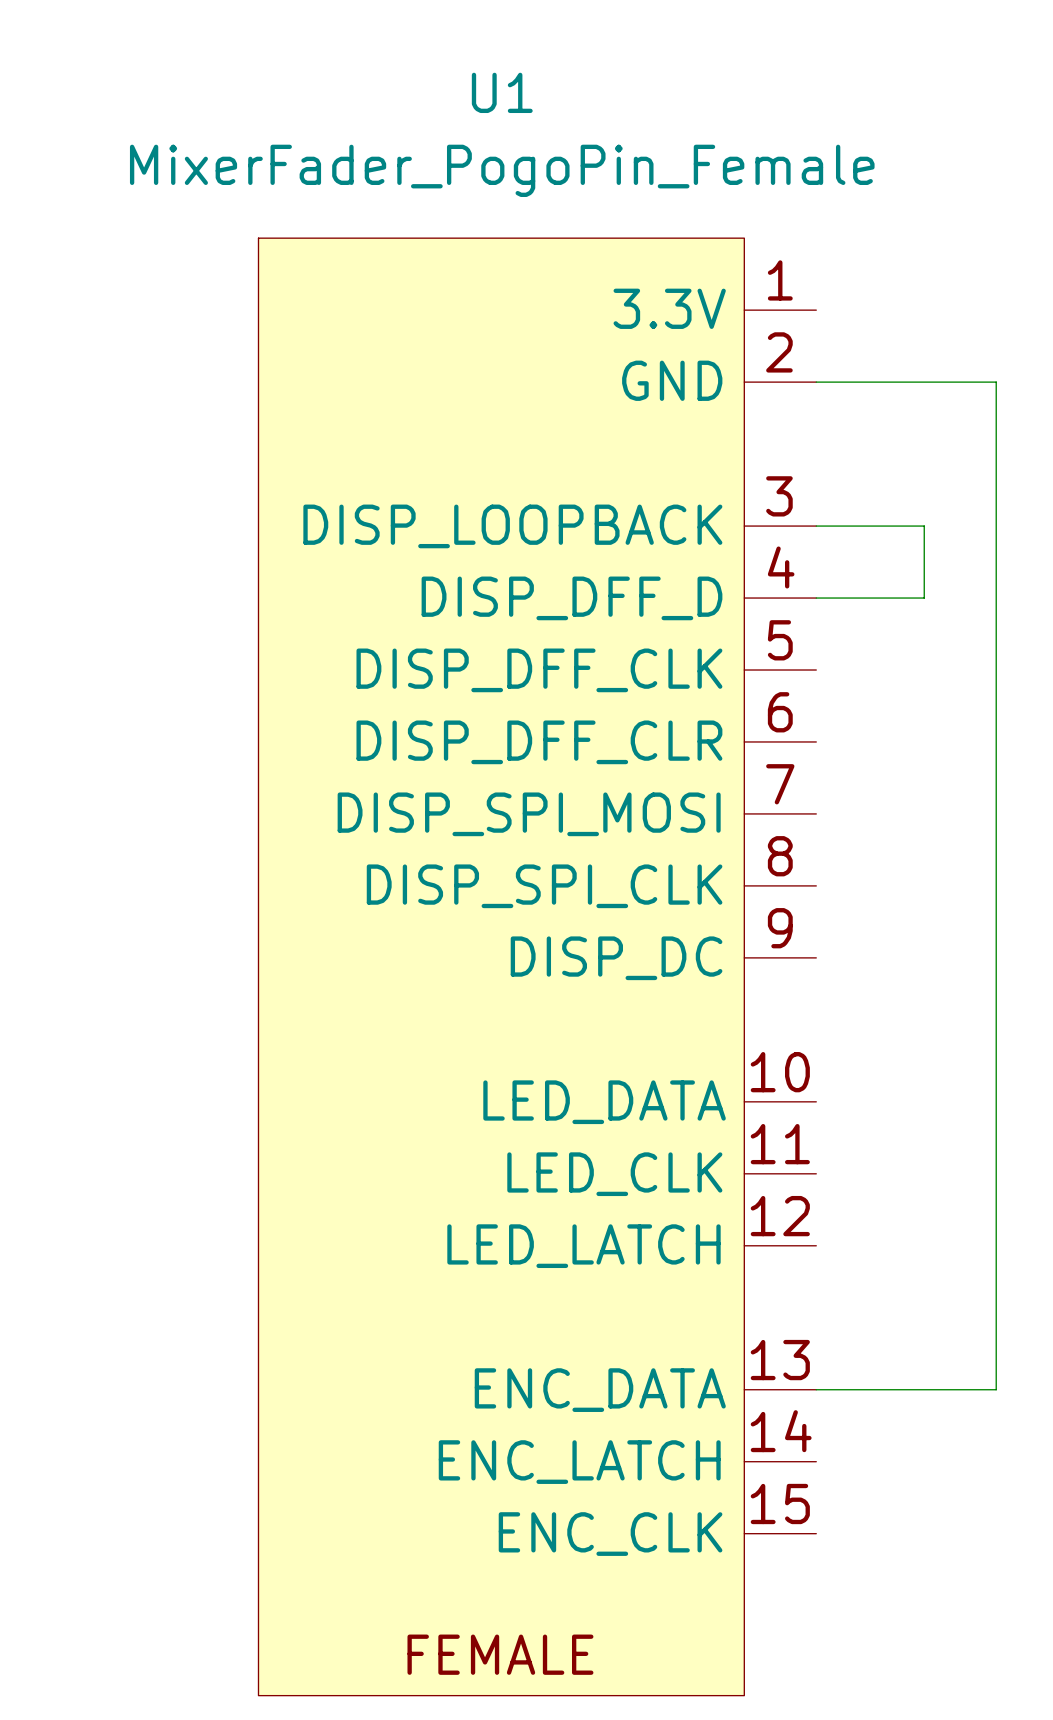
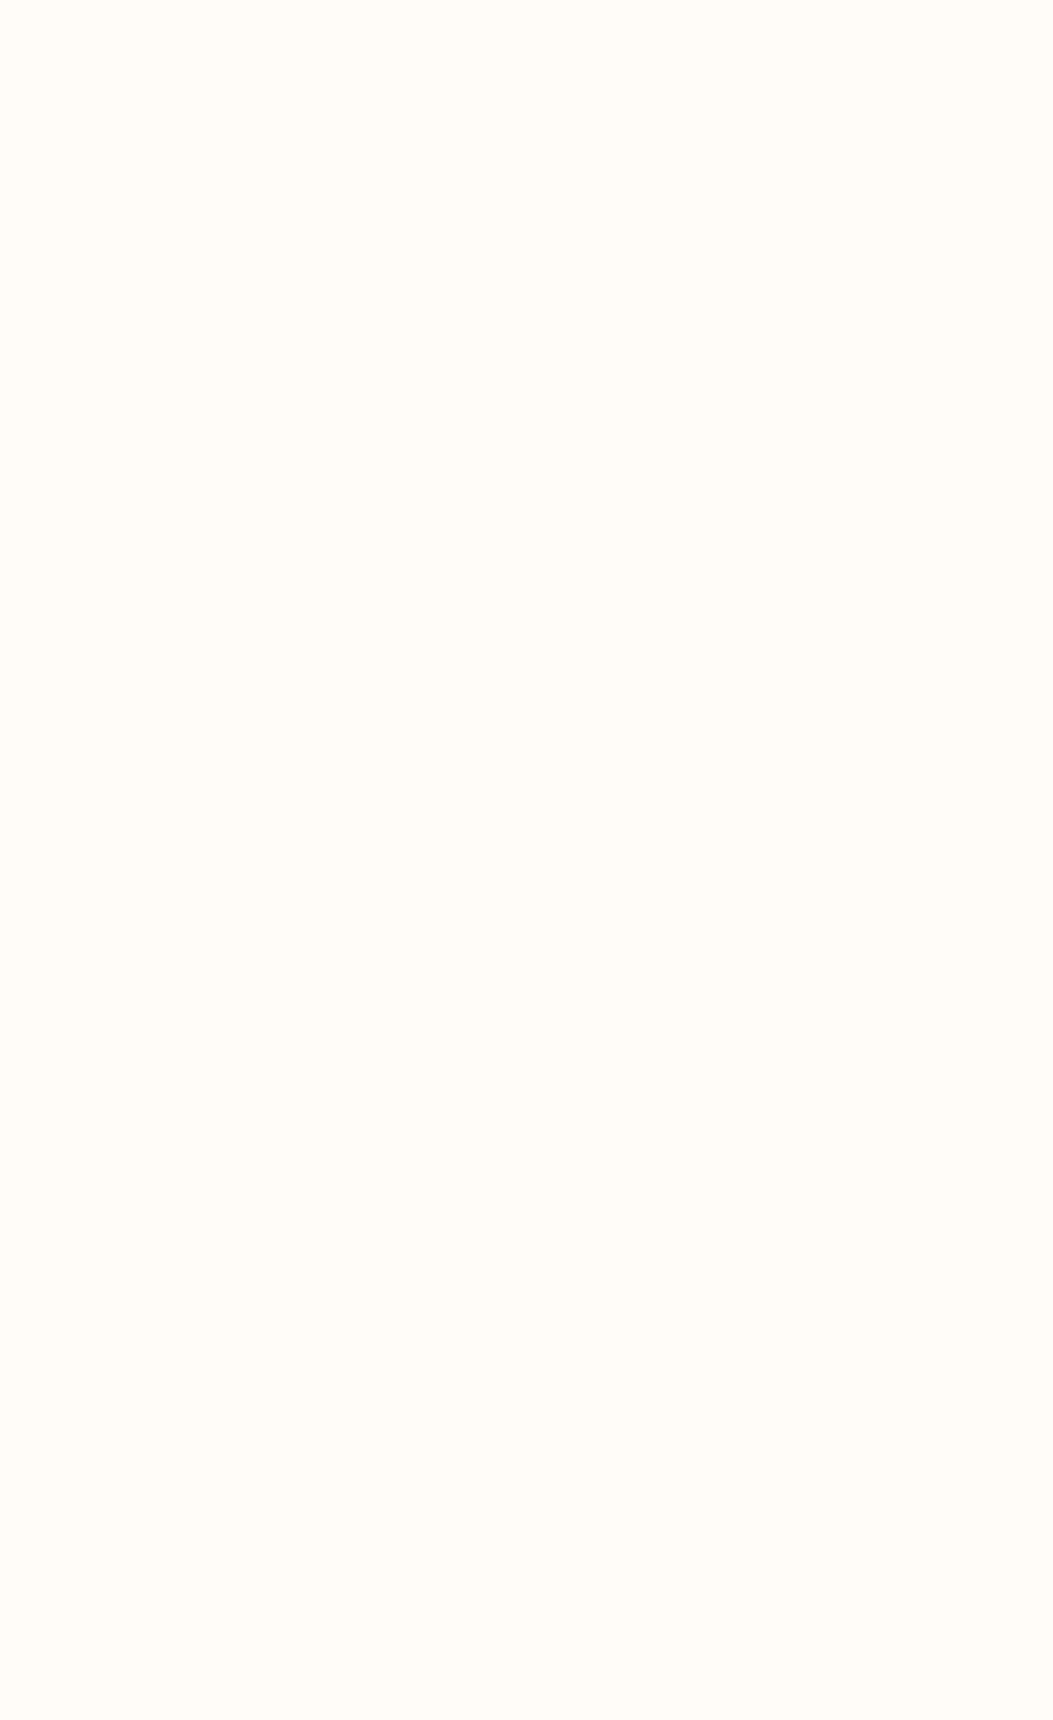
wire: (816, 382) (996, 382) (996, 1389) (816, 1389) -> none
wire: (816, 526) (924, 526) (924, 598) (816, 598) -> none
U1: MixerFader_PogoPin_Female (537, 966) -> none

